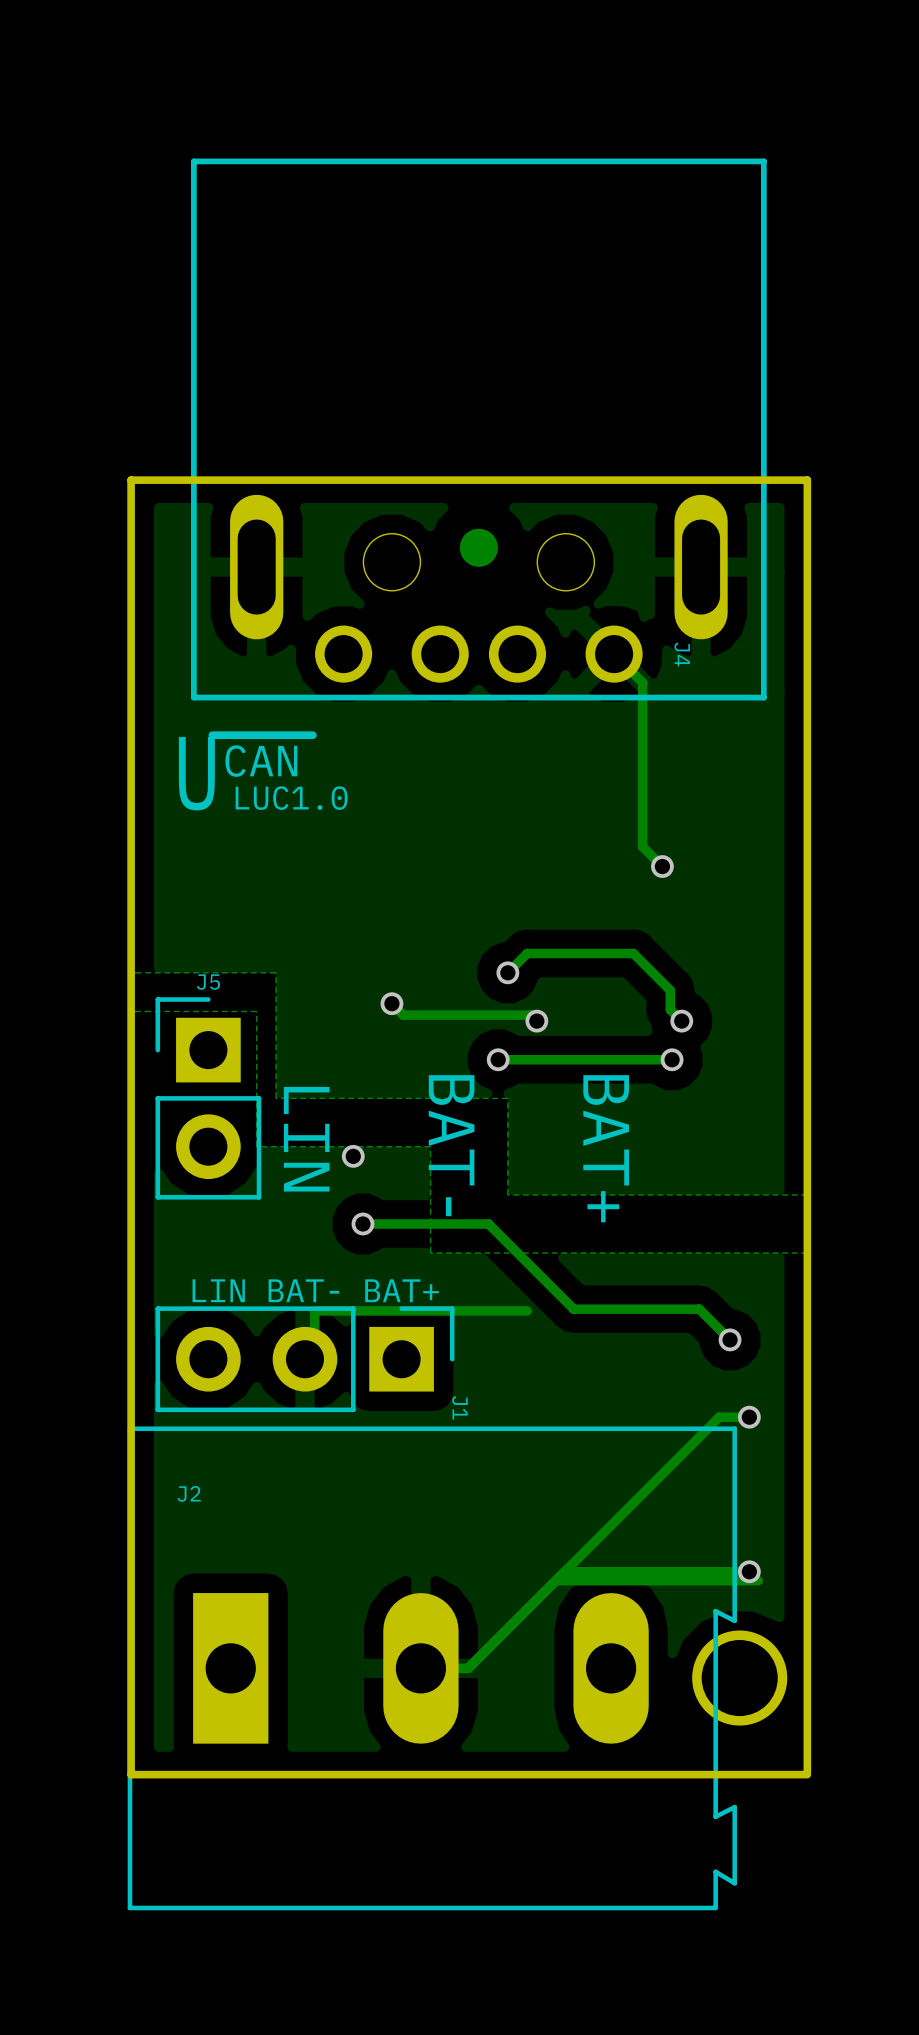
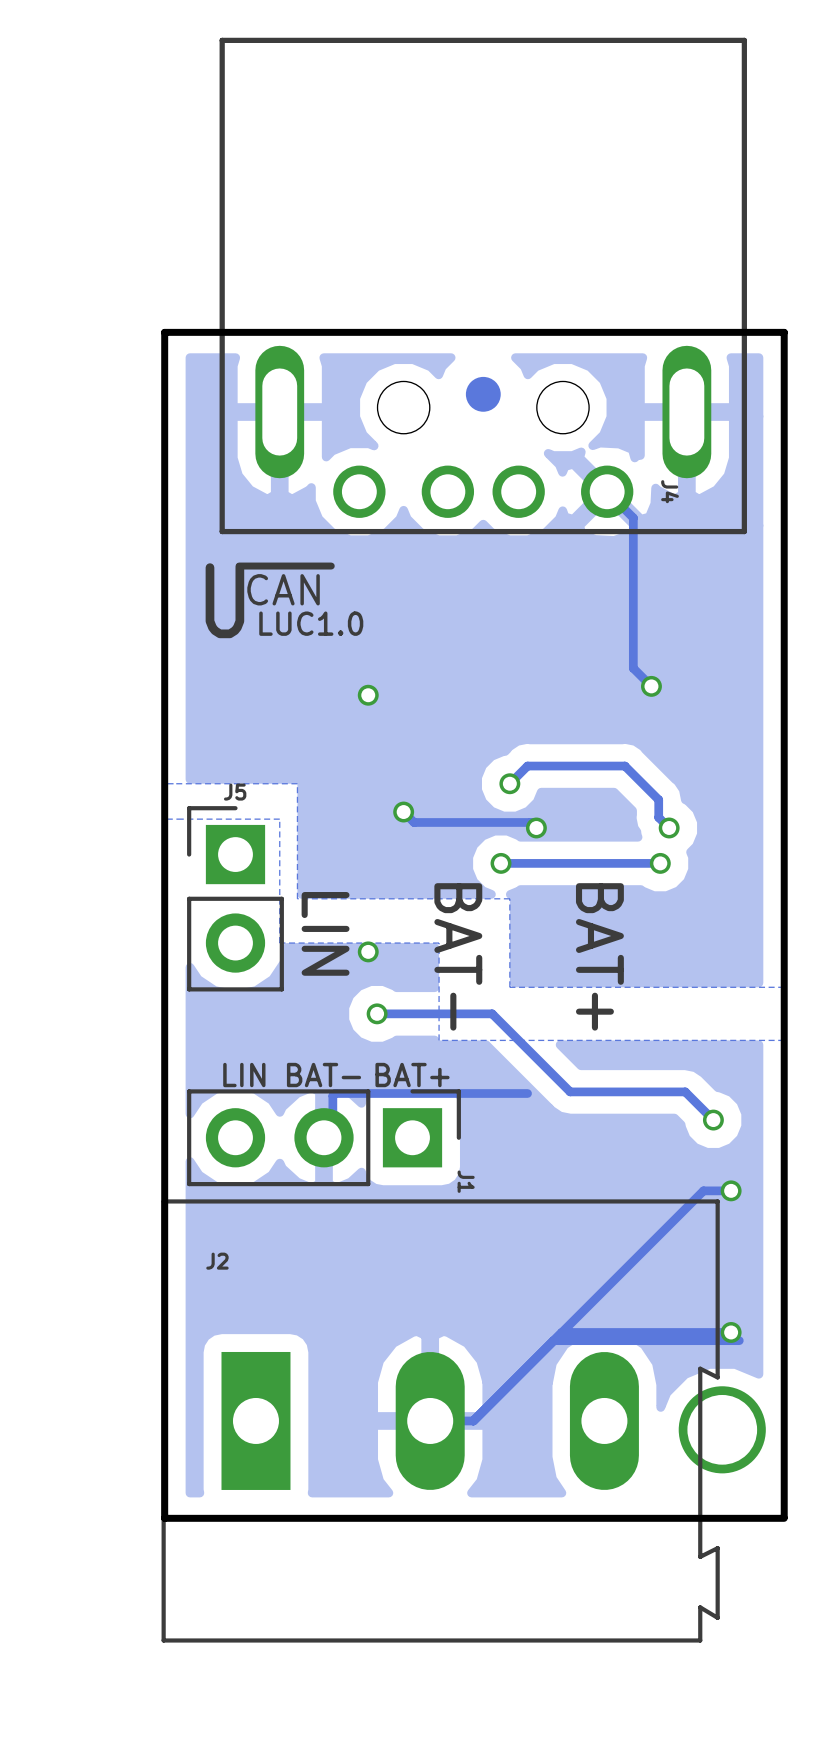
via: none -> (368, 695)

